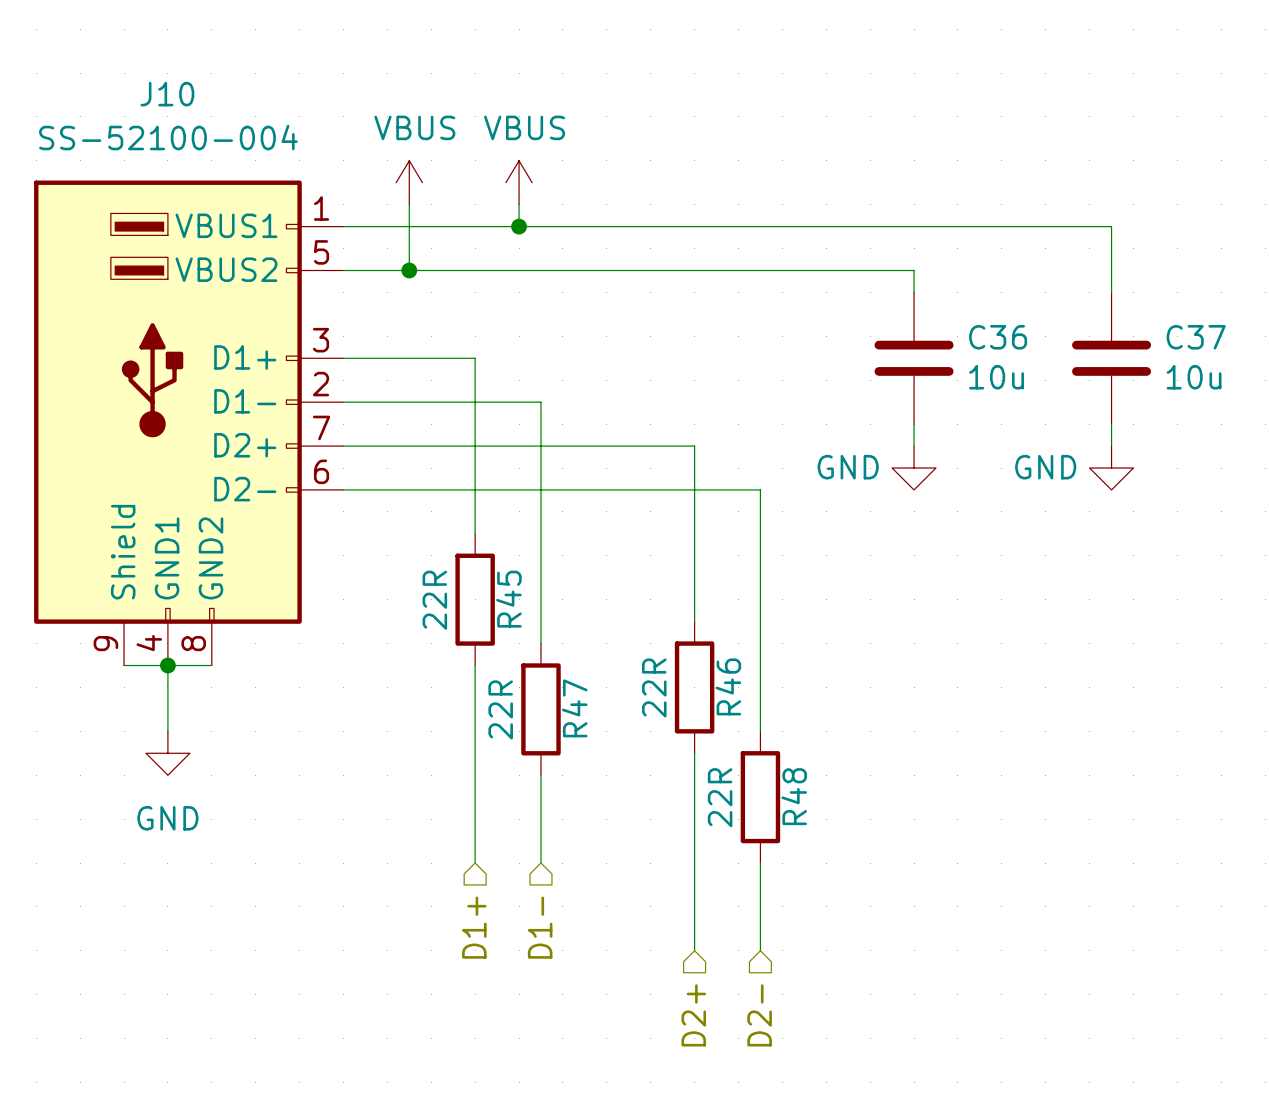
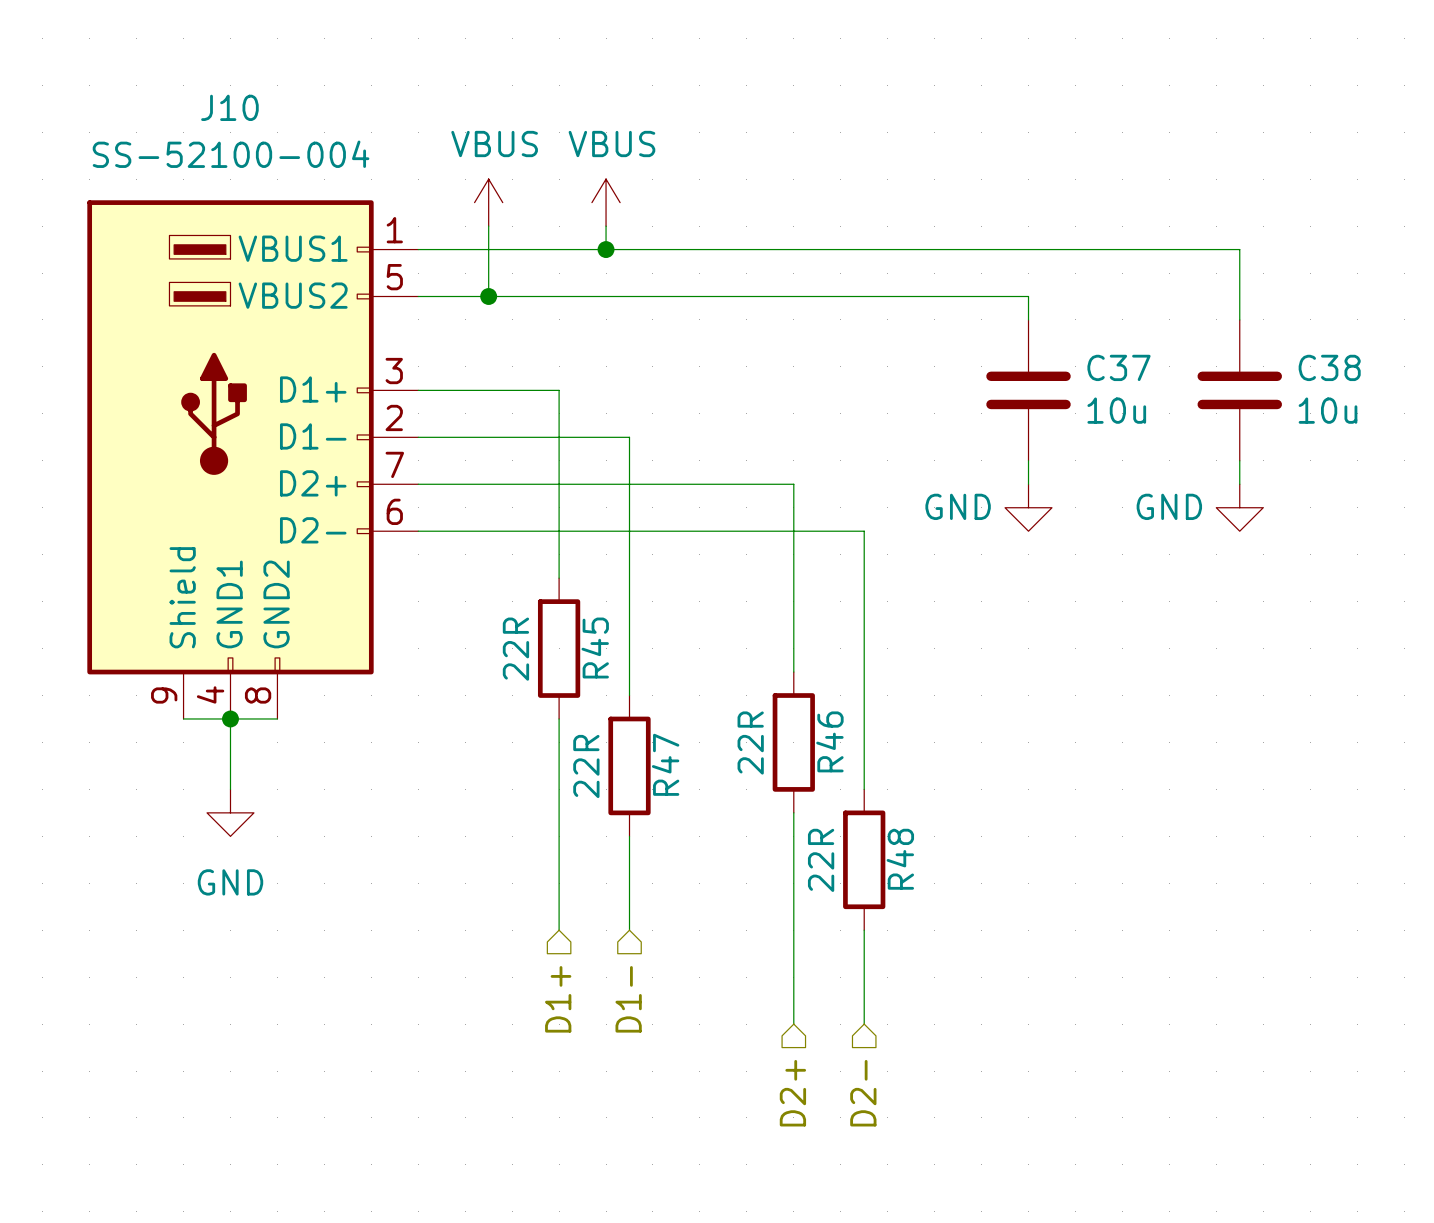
C36 name: C36 (998, 337) -> C37 (1119, 367)
C37 name: C37 (1196, 337) -> C38 (1329, 367)

